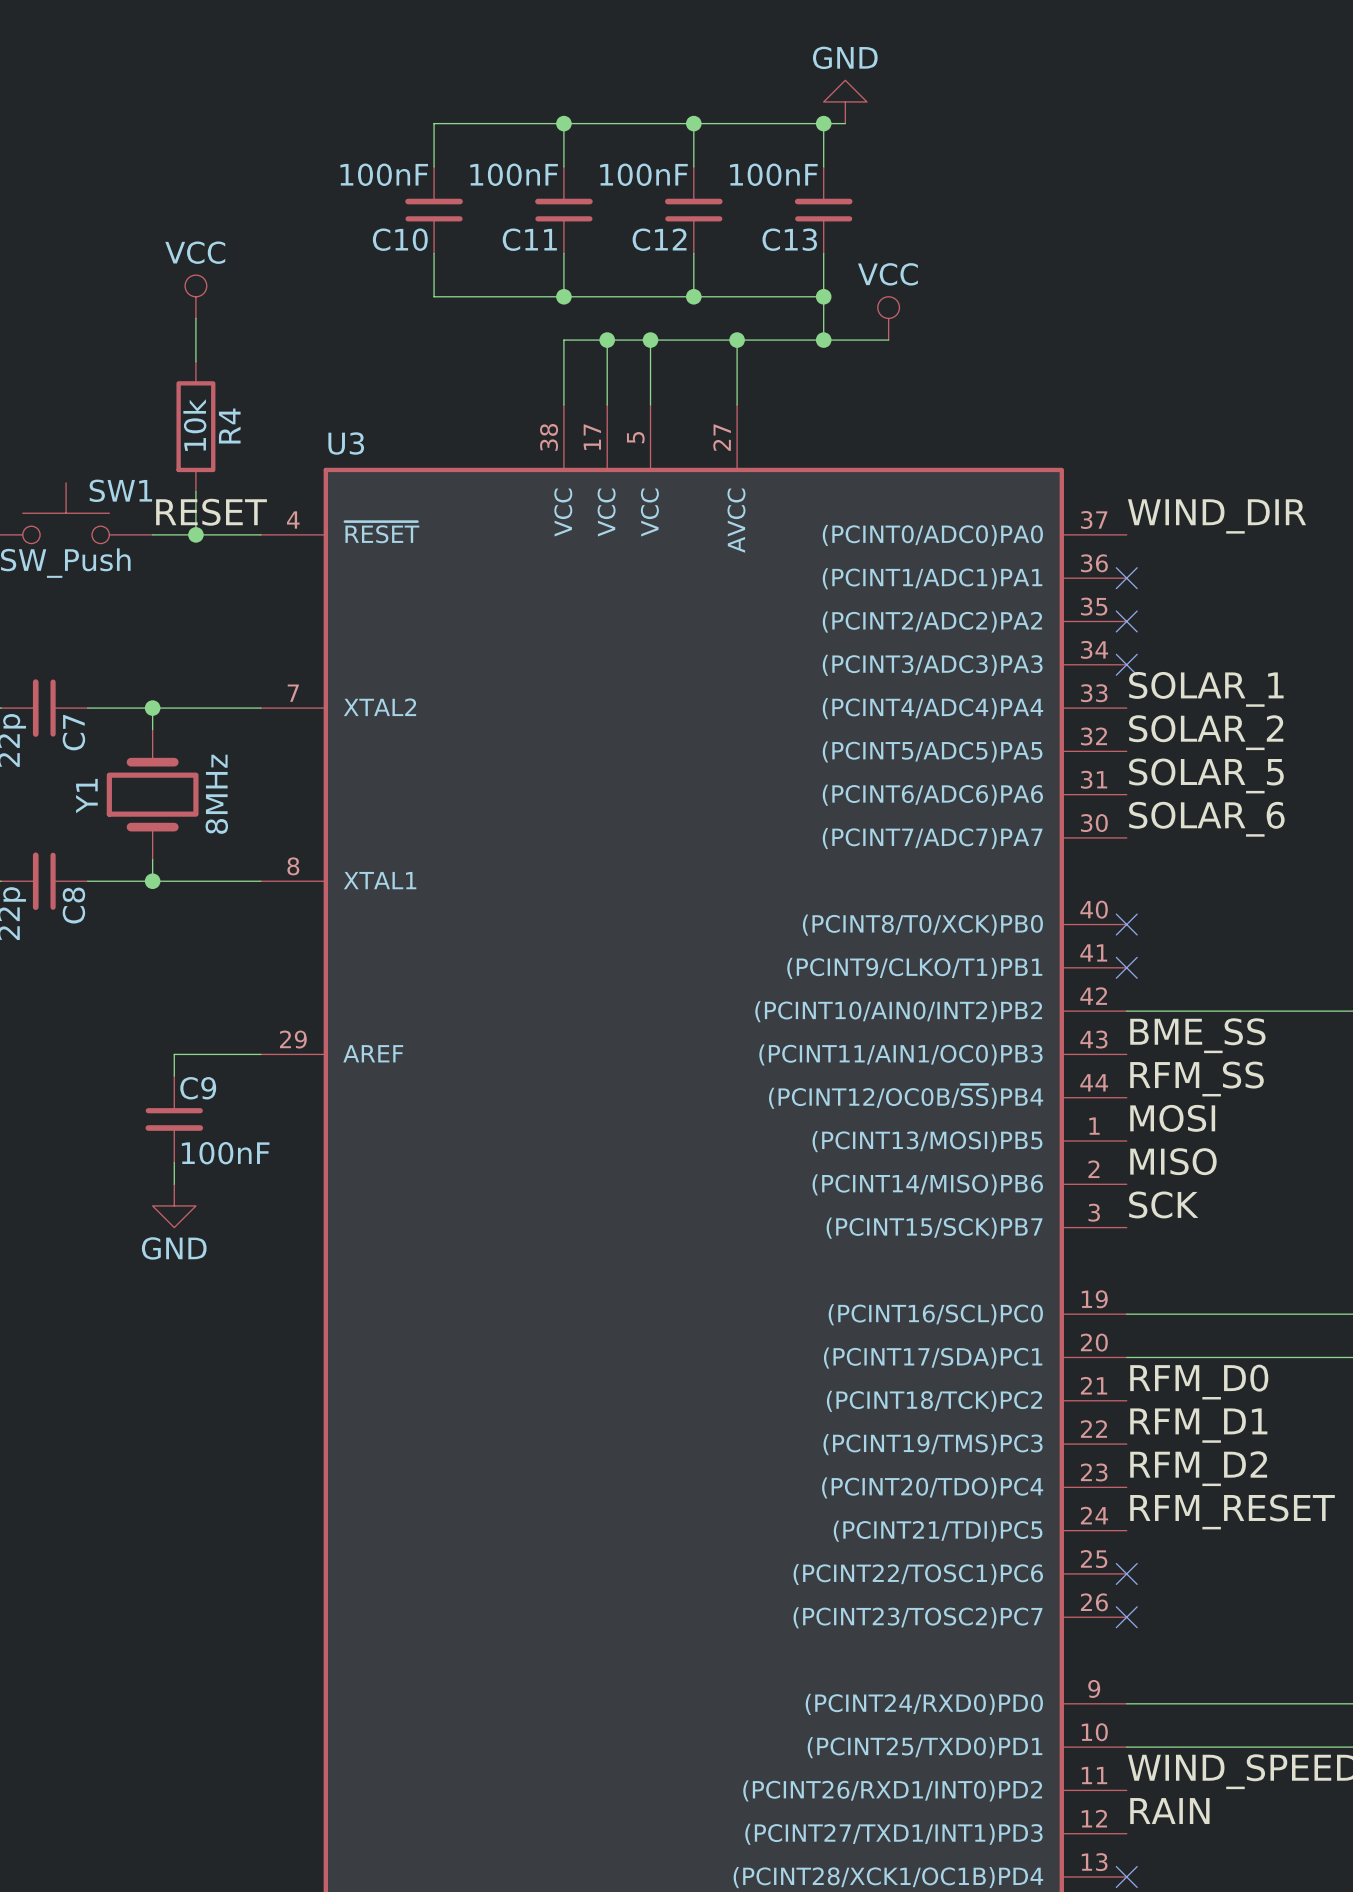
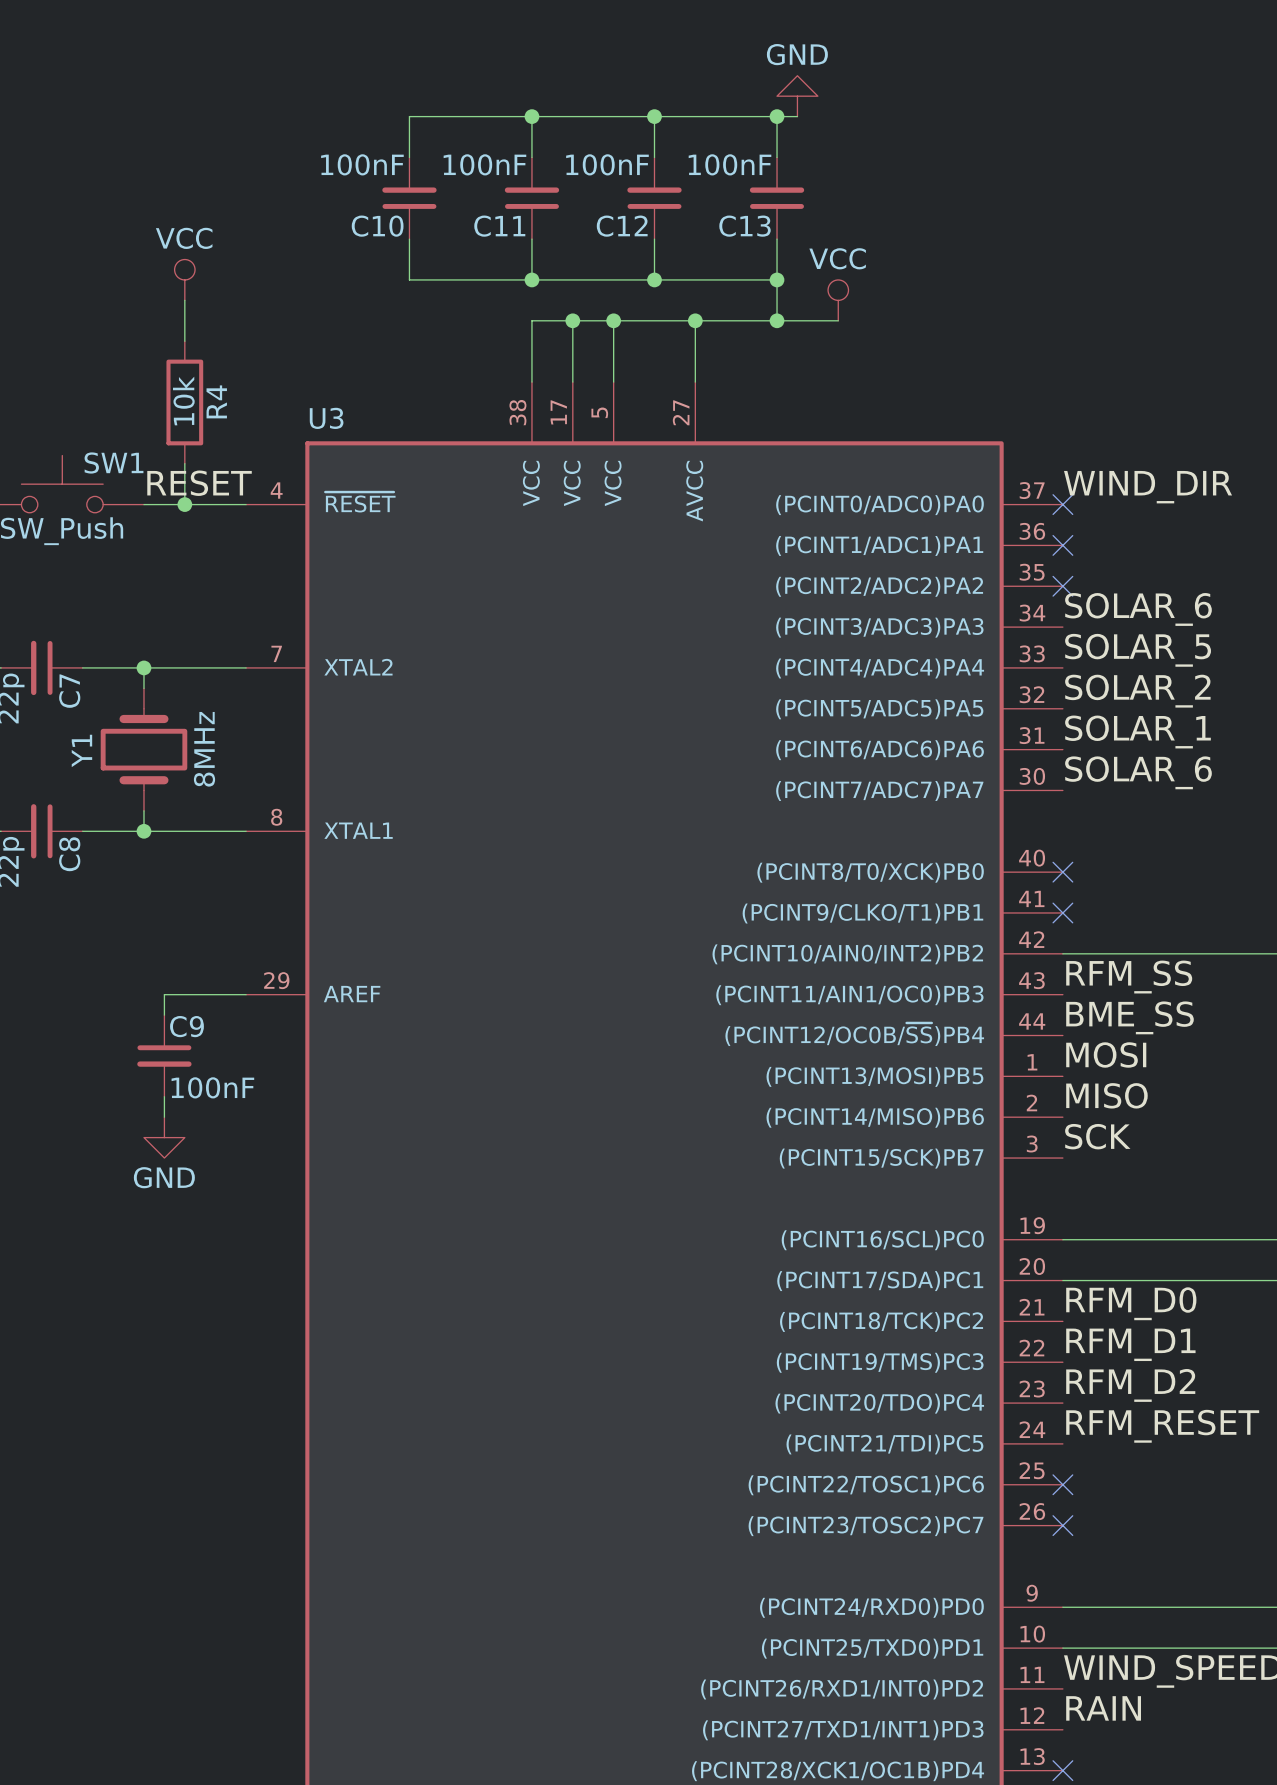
no-connect mark: none -> (1062, 504)
label: none -> SOLAR_6 (1138, 609)
no-connect mark: (1126, 664) -> none
label: SOLAR_1 (1206, 689) -> SOLAR_5 (1138, 650)
label: SOLAR_5 (1206, 775) -> SOLAR_1 (1137, 731)
label: BME_SS (1197, 1035) -> RFM_SS (1129, 977)
label: RFM_SS (1197, 1079) -> BME_SS (1129, 1017)

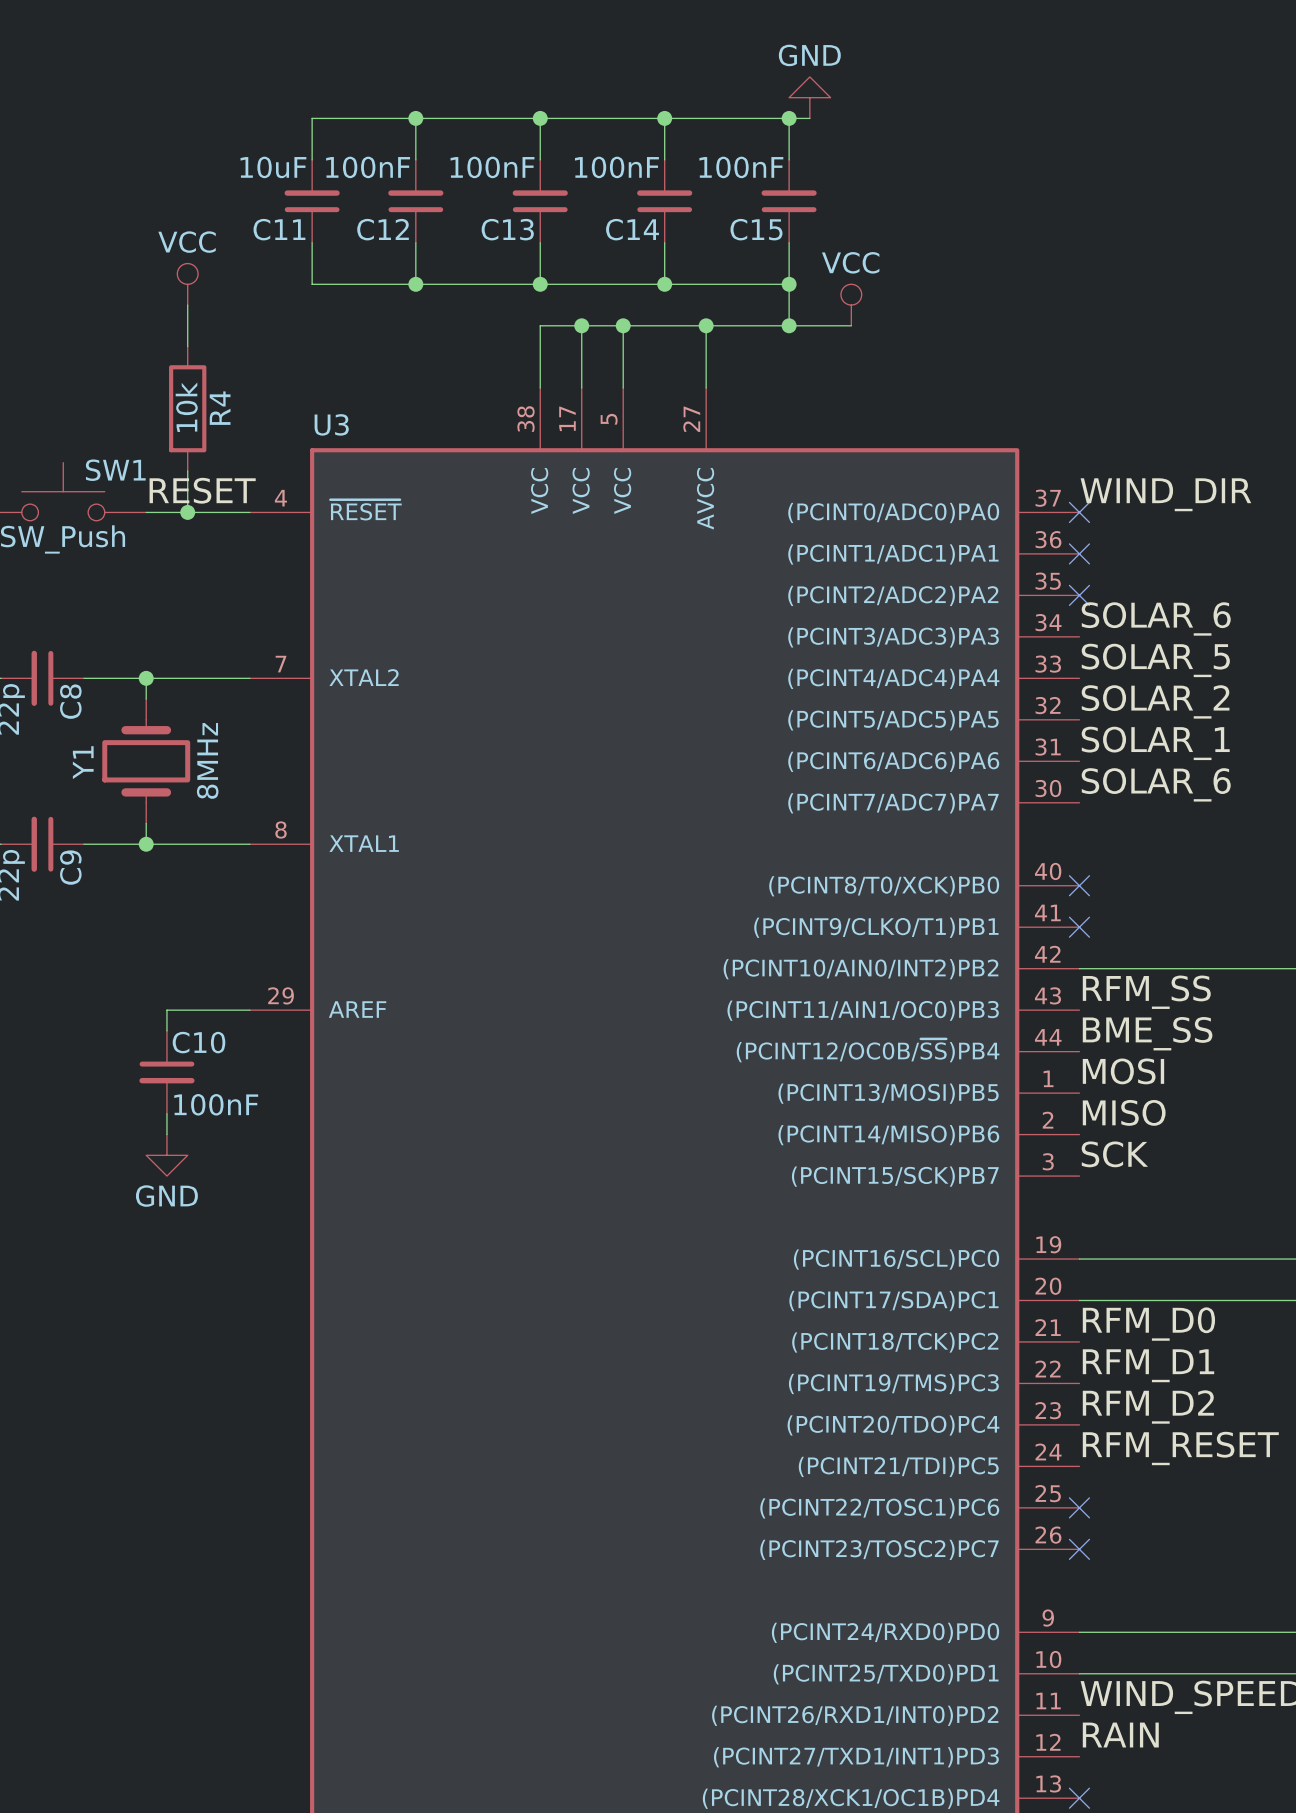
wire: none -> (415, 118) (312, 118) (312, 159)
junction: none -> (415, 118)
C11: none -> 10uF (312, 201)
C10 name: C10 (377, 226) -> C12 (383, 229)
C11 name: C11 (499, 226) -> C13 (507, 229)
C12 name: C12 (622, 226) -> C14 (632, 229)
C13 name: C13 (744, 226) -> C15 (756, 229)
wire: none -> (312, 242) (312, 284) (415, 284)
junction: none -> (415, 284)
C7 name: C7 (69, 691) -> C8 (70, 701)
C8 name: C8 (69, 854) -> C9 (70, 867)
C9 name: C9 (186, 1026) -> C10 (199, 1042)

